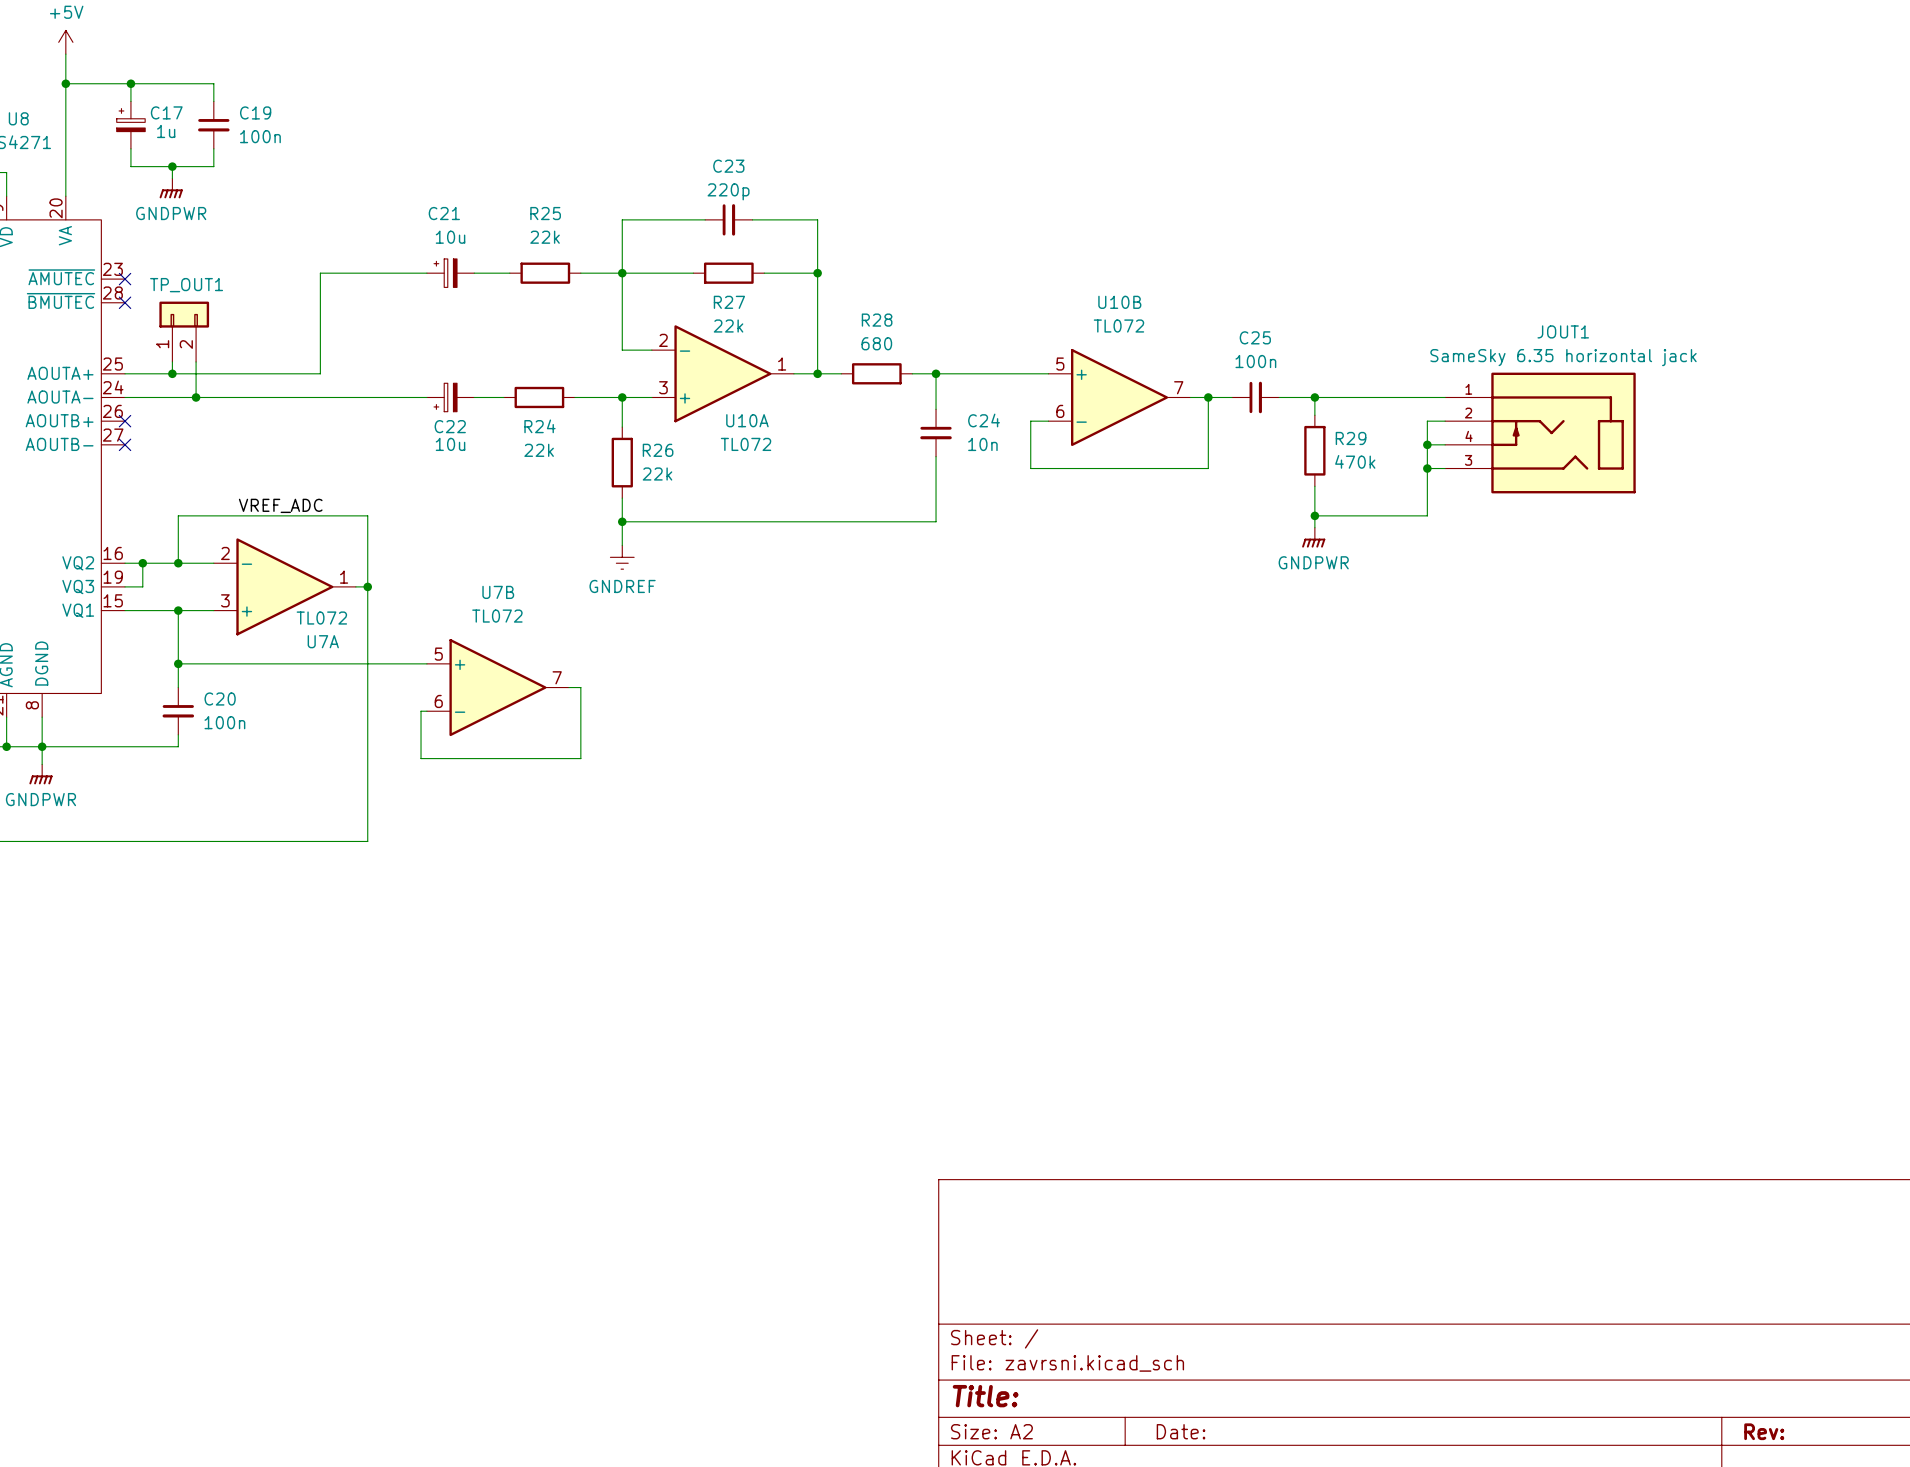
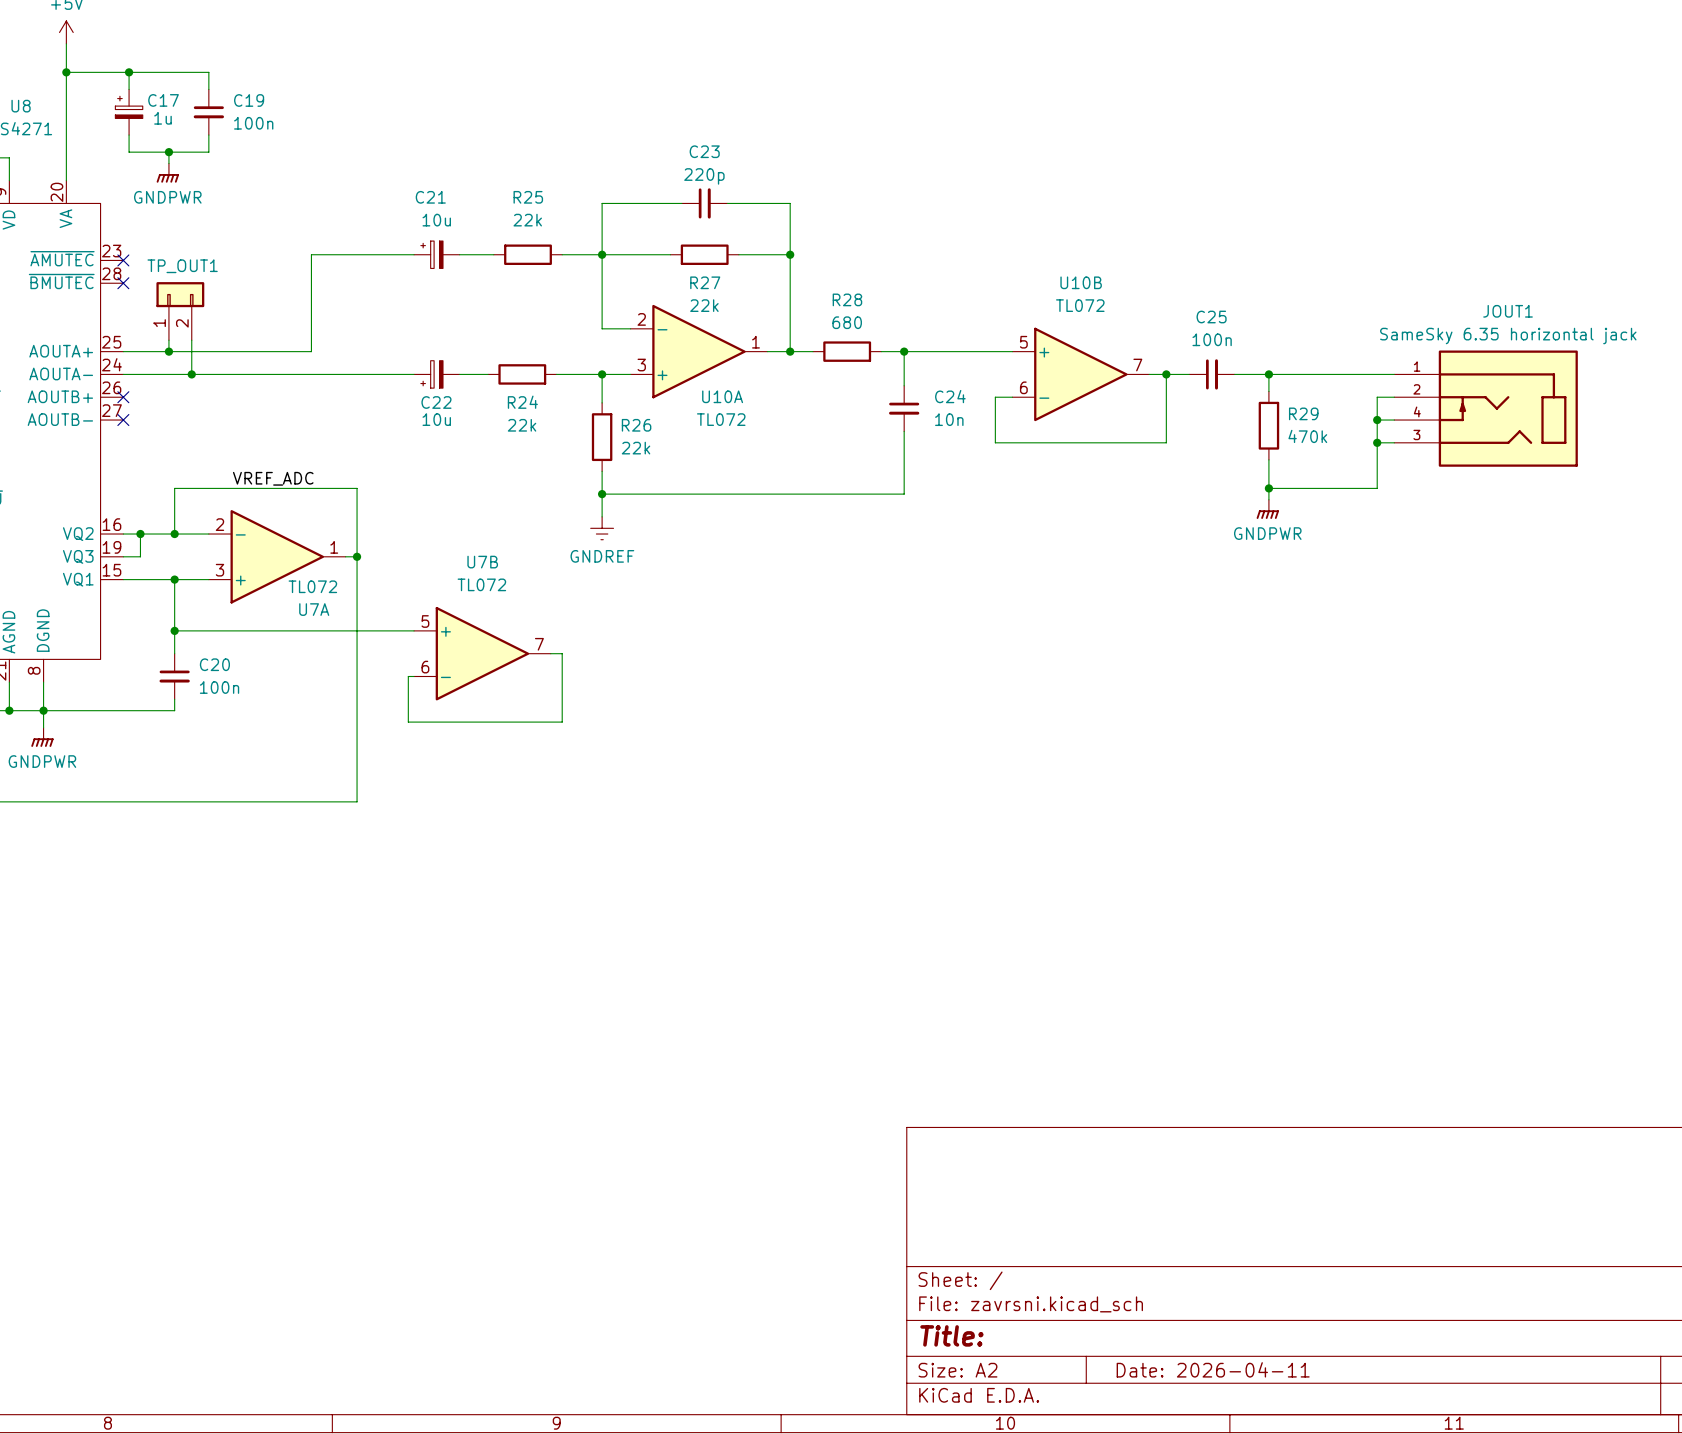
title block: Date: (1181, 1431) -> Date: 2026-04-11 (1213, 1369)

